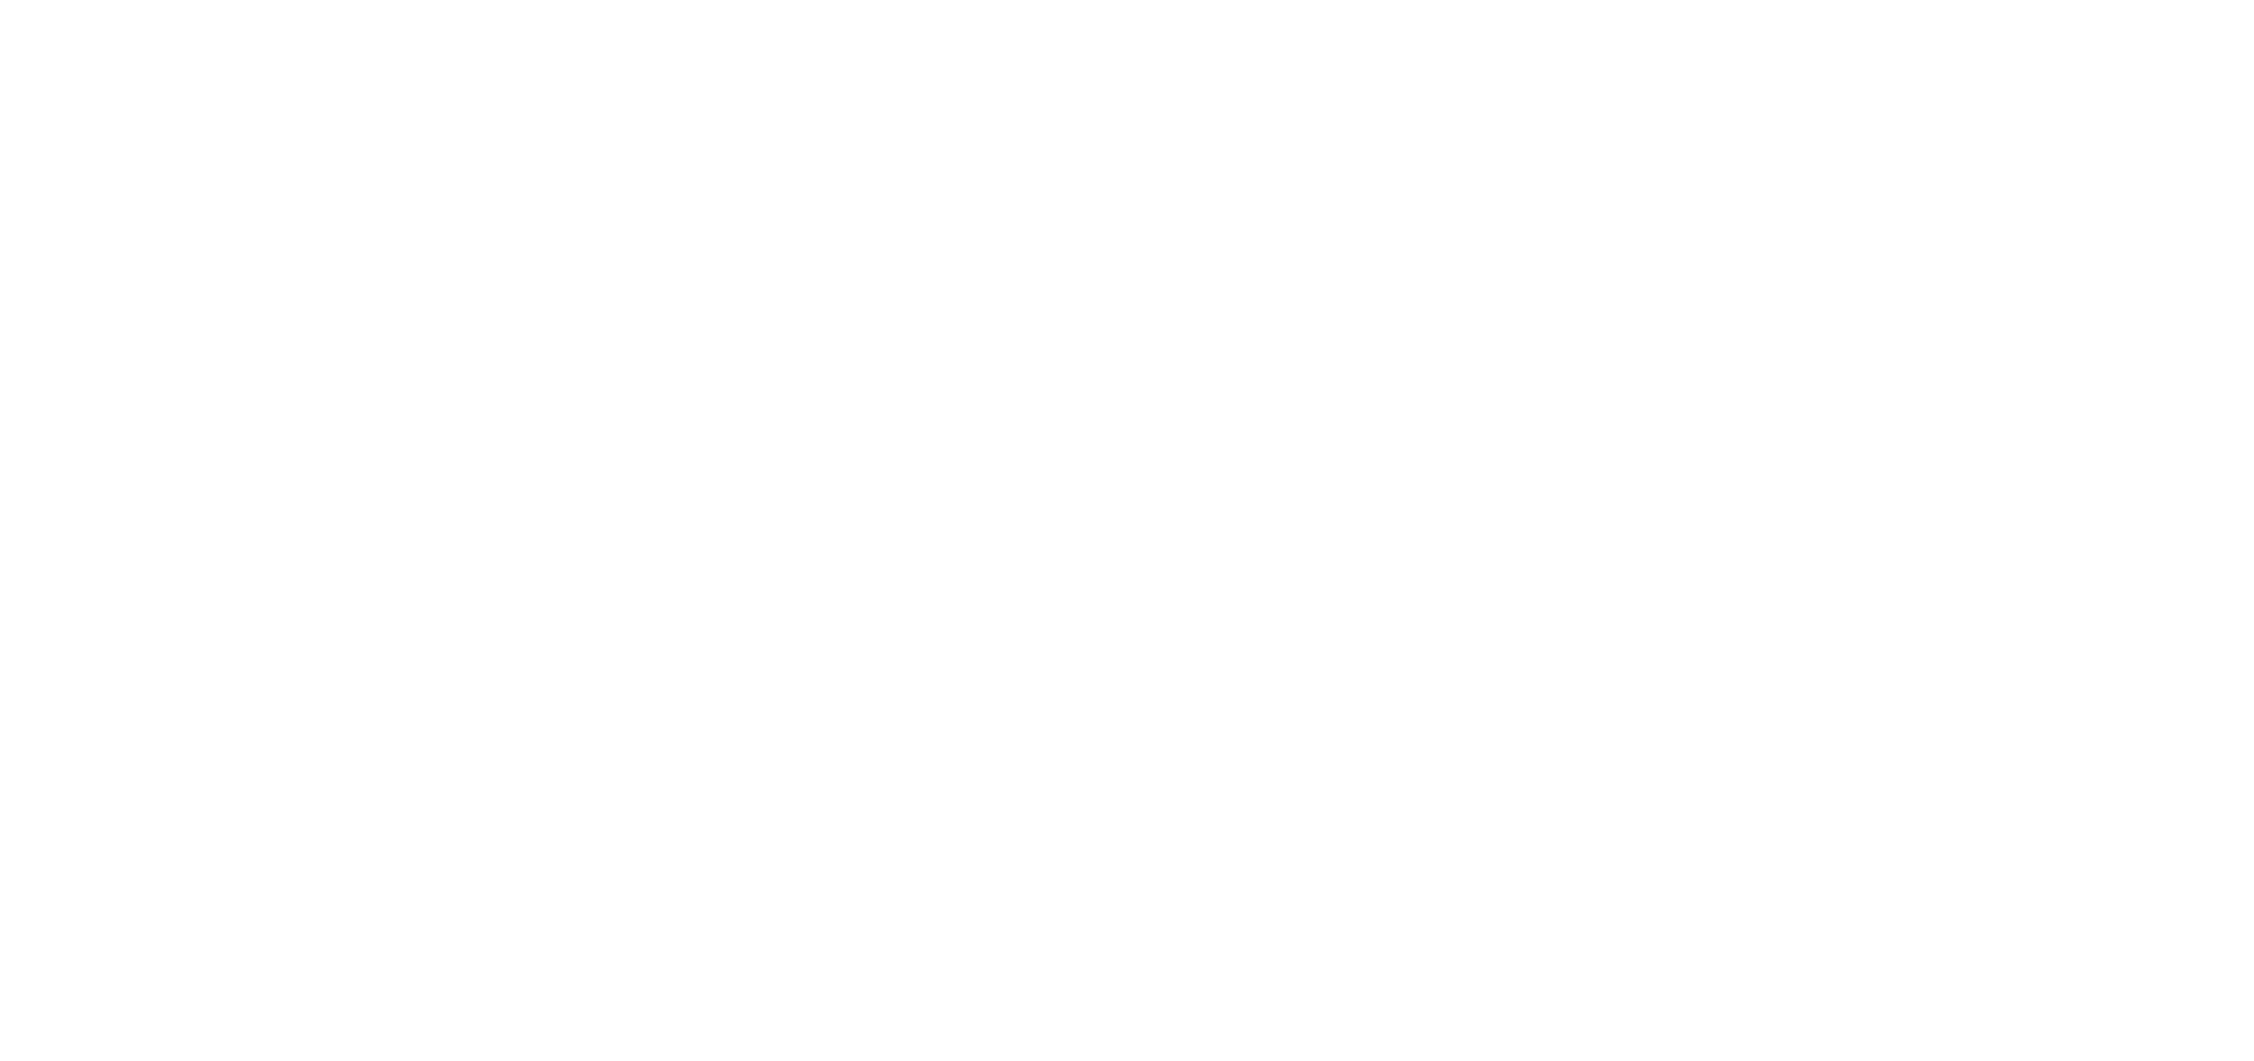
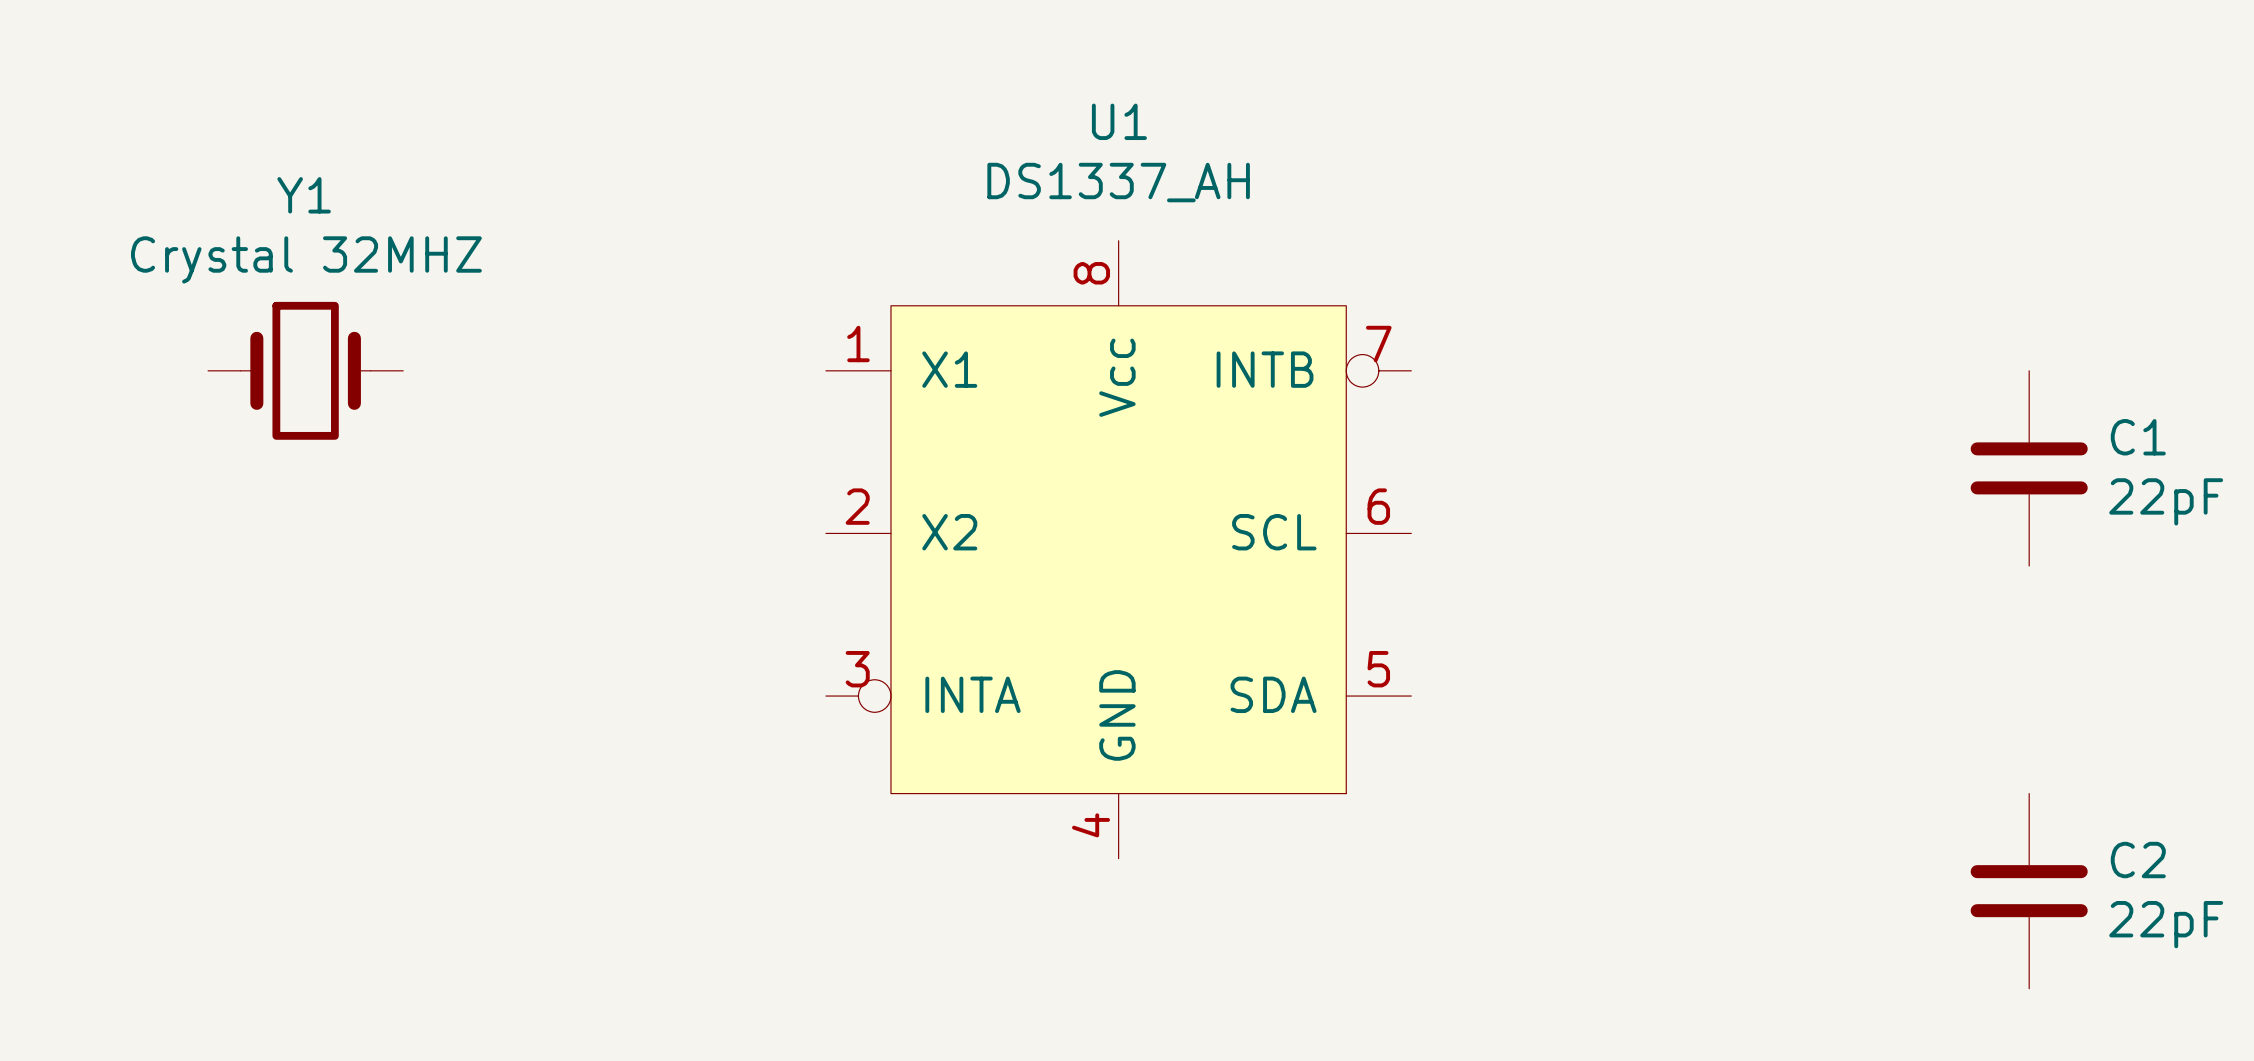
Y1: none -> Crystal 32MHZ (305, 370)
C1: none -> 22pF (2029, 468)
U1: none -> DS1337_AH (1118, 549)
C2: none -> 22pF (2029, 891)

